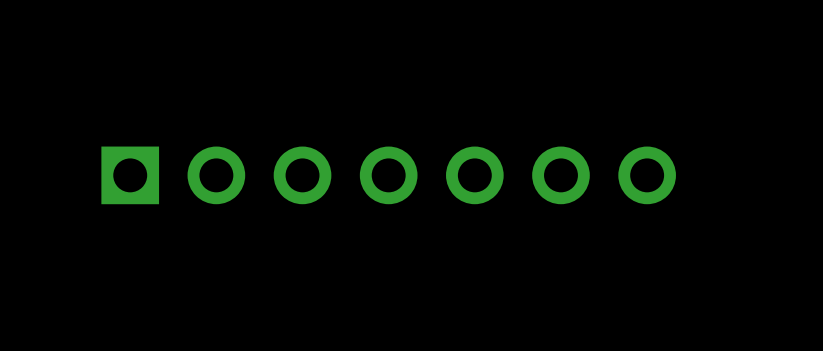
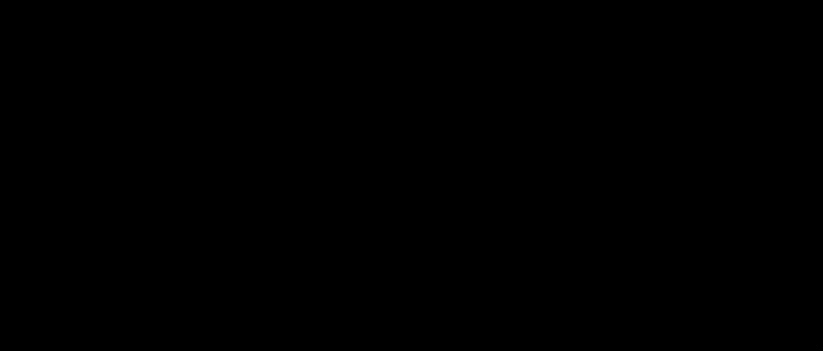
part: (388, 175) -> none

